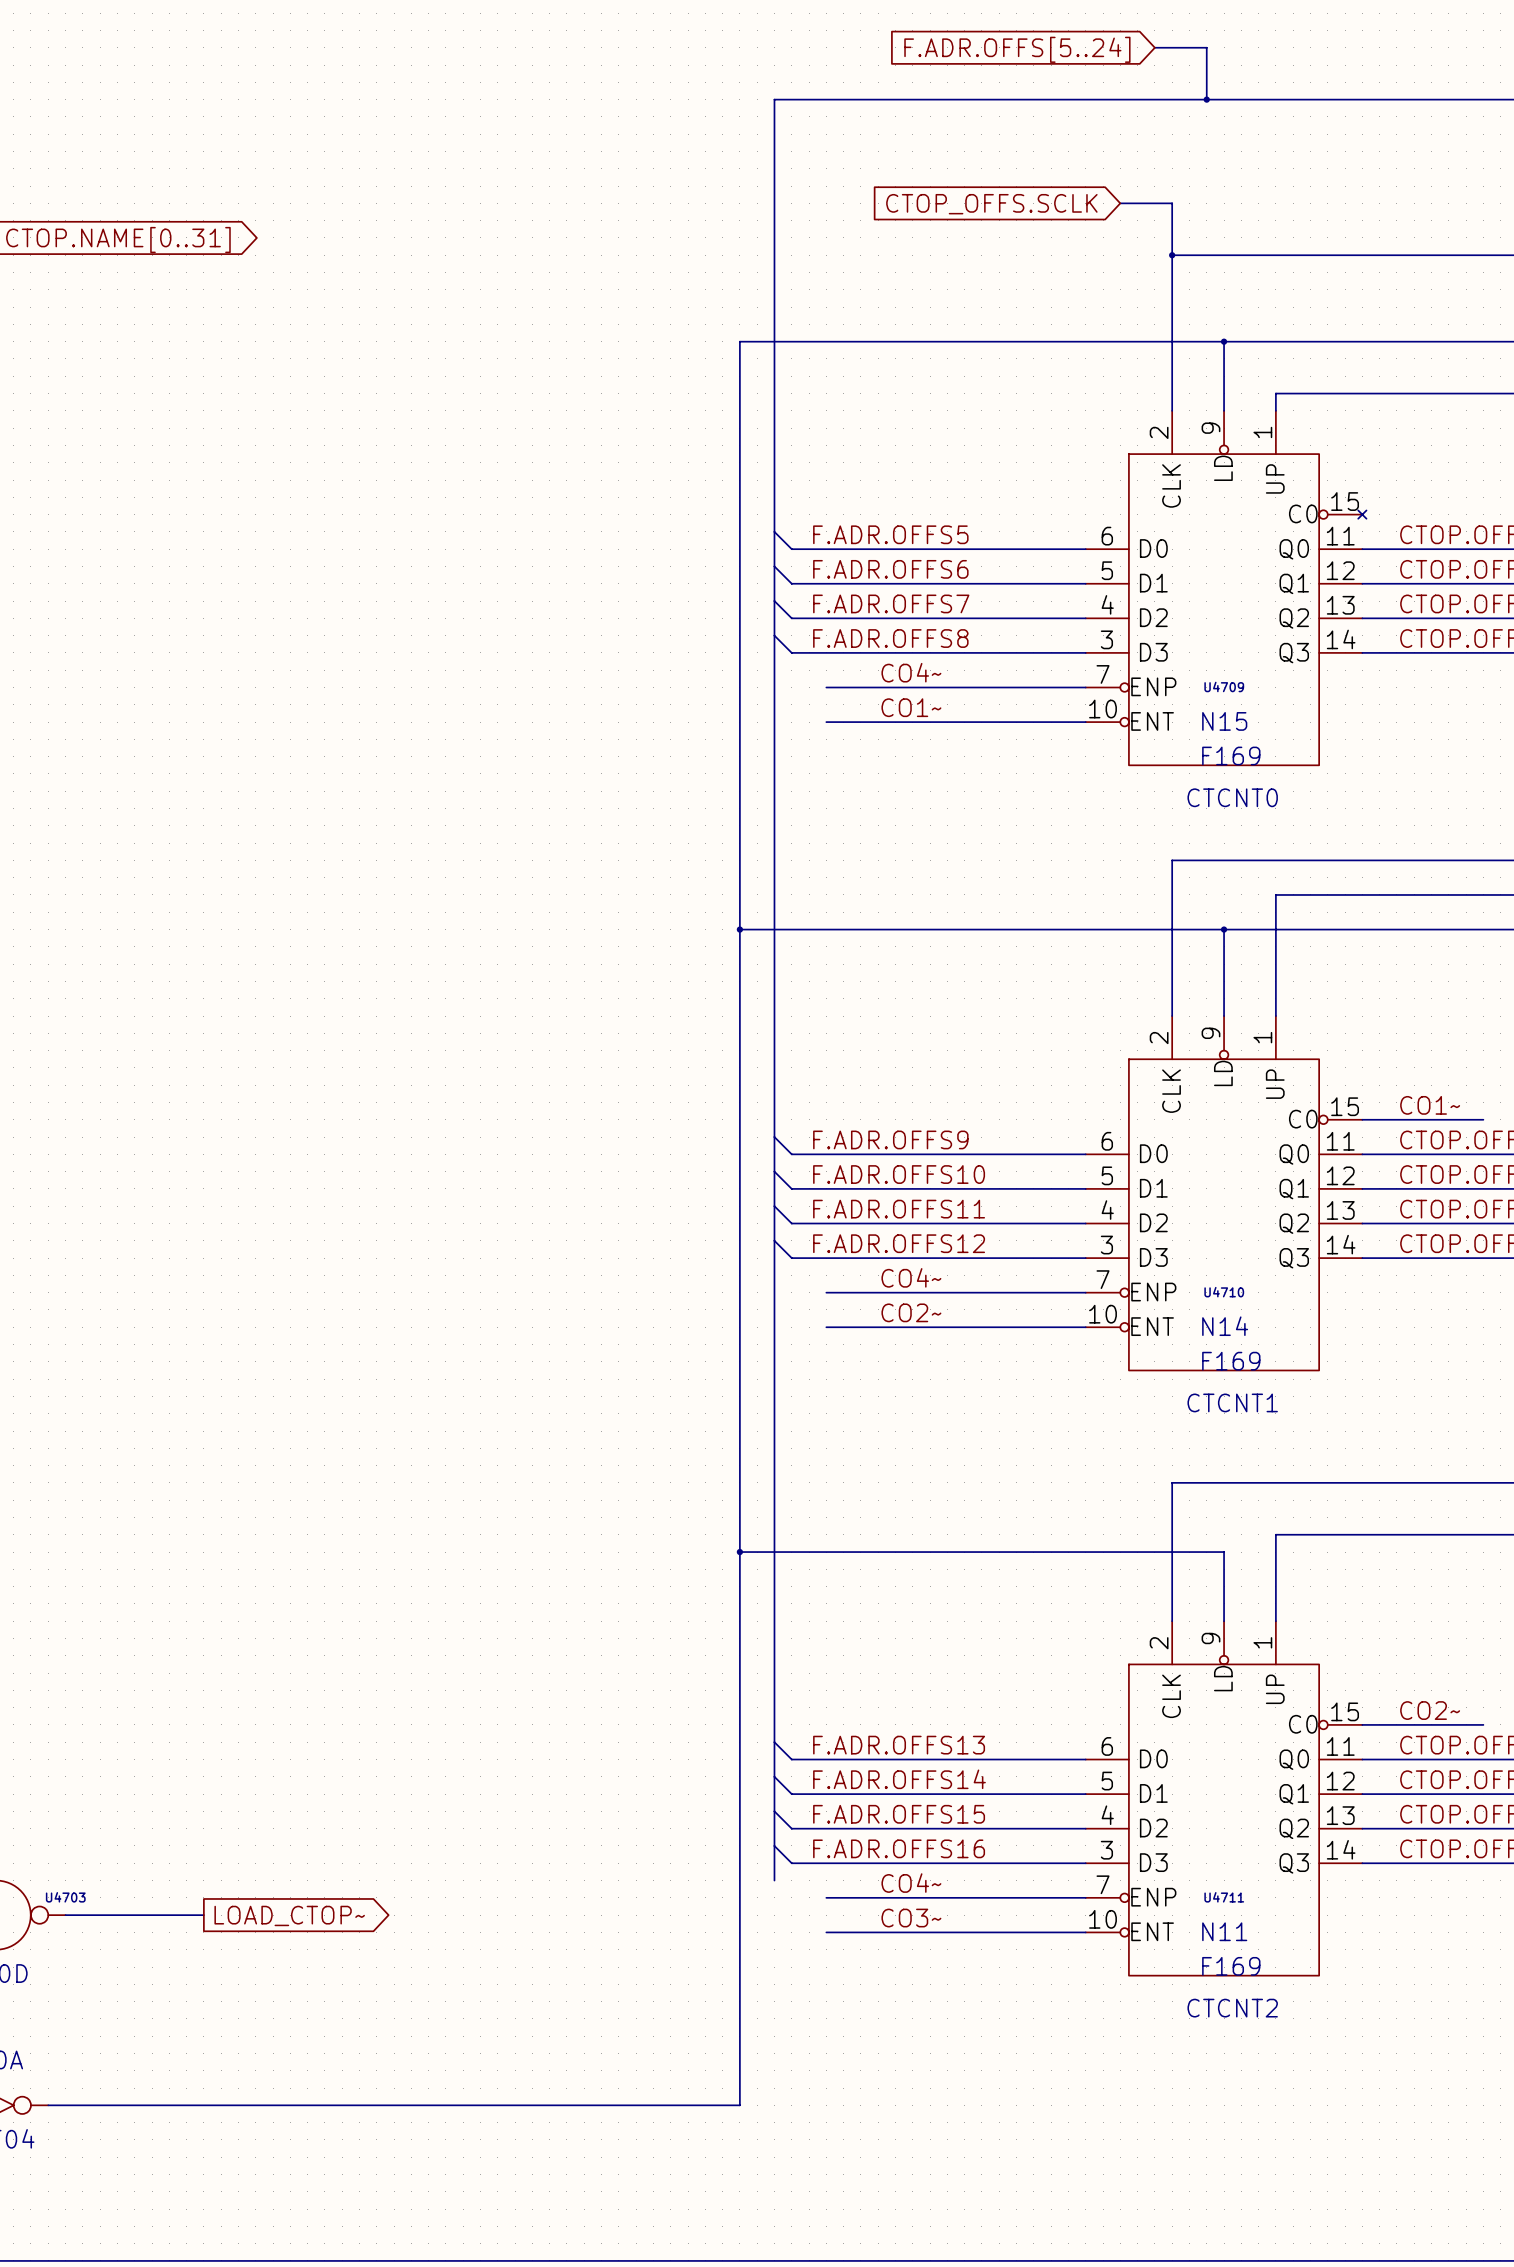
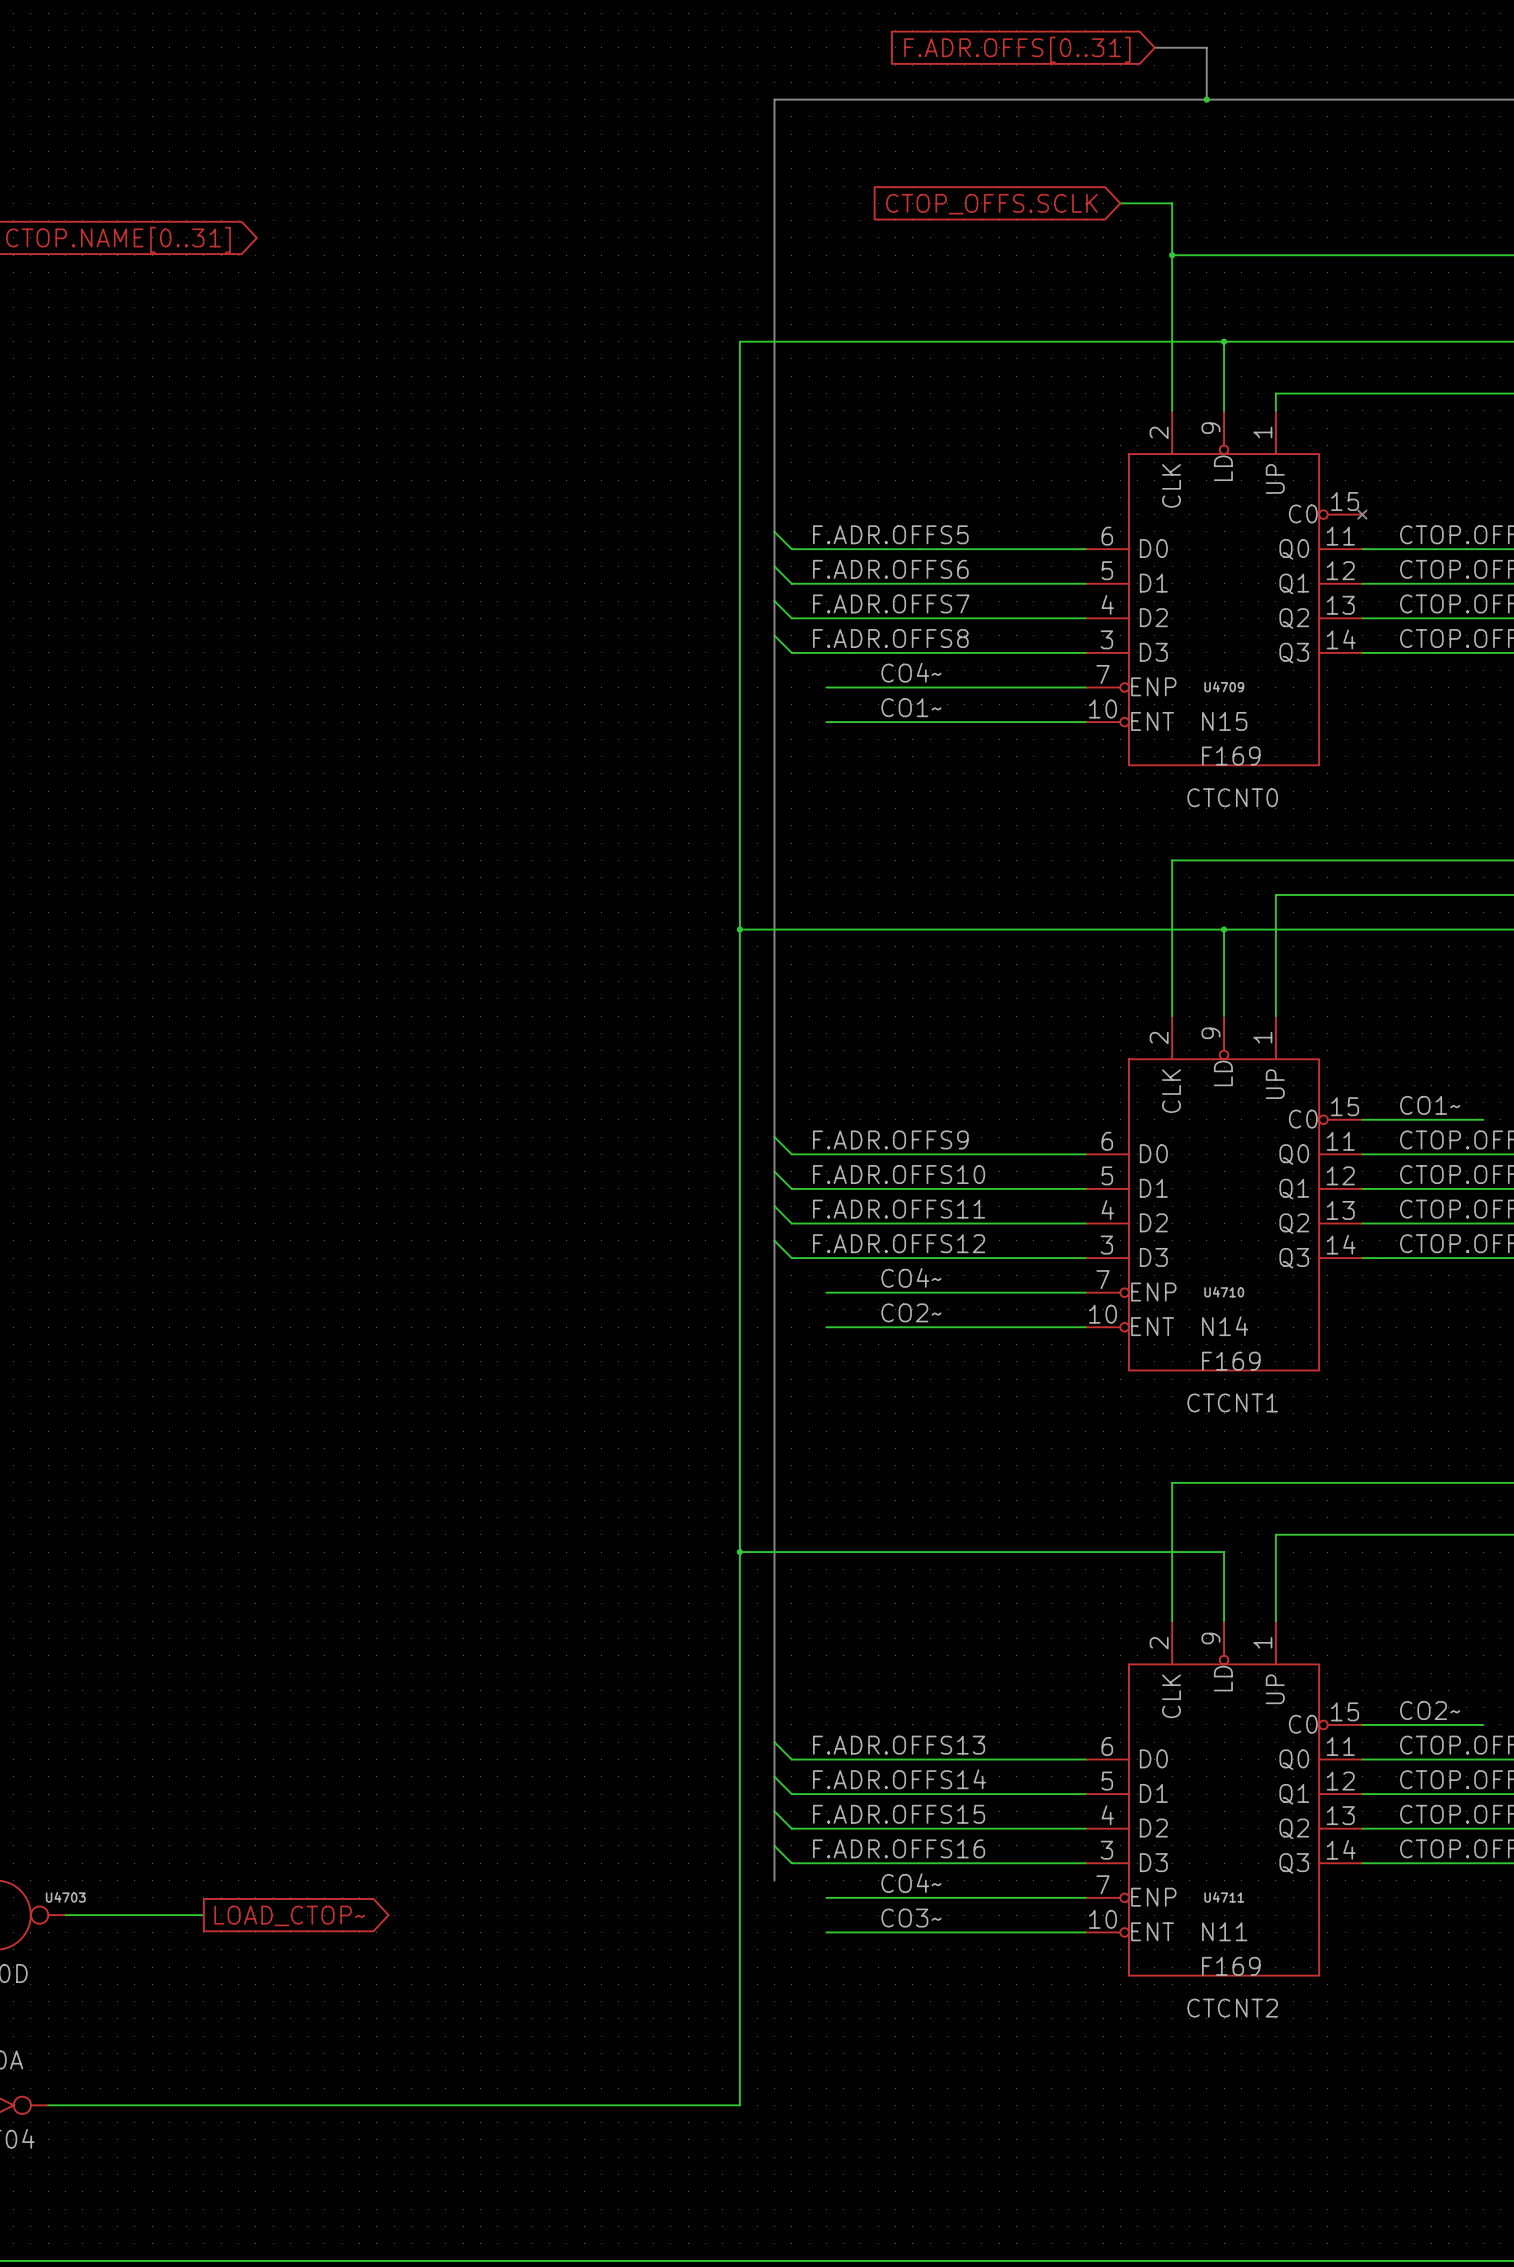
global label: F.ADR.OFFS[5..24] (1017, 49) -> F.ADR.OFFS[0..31] (1017, 49)

